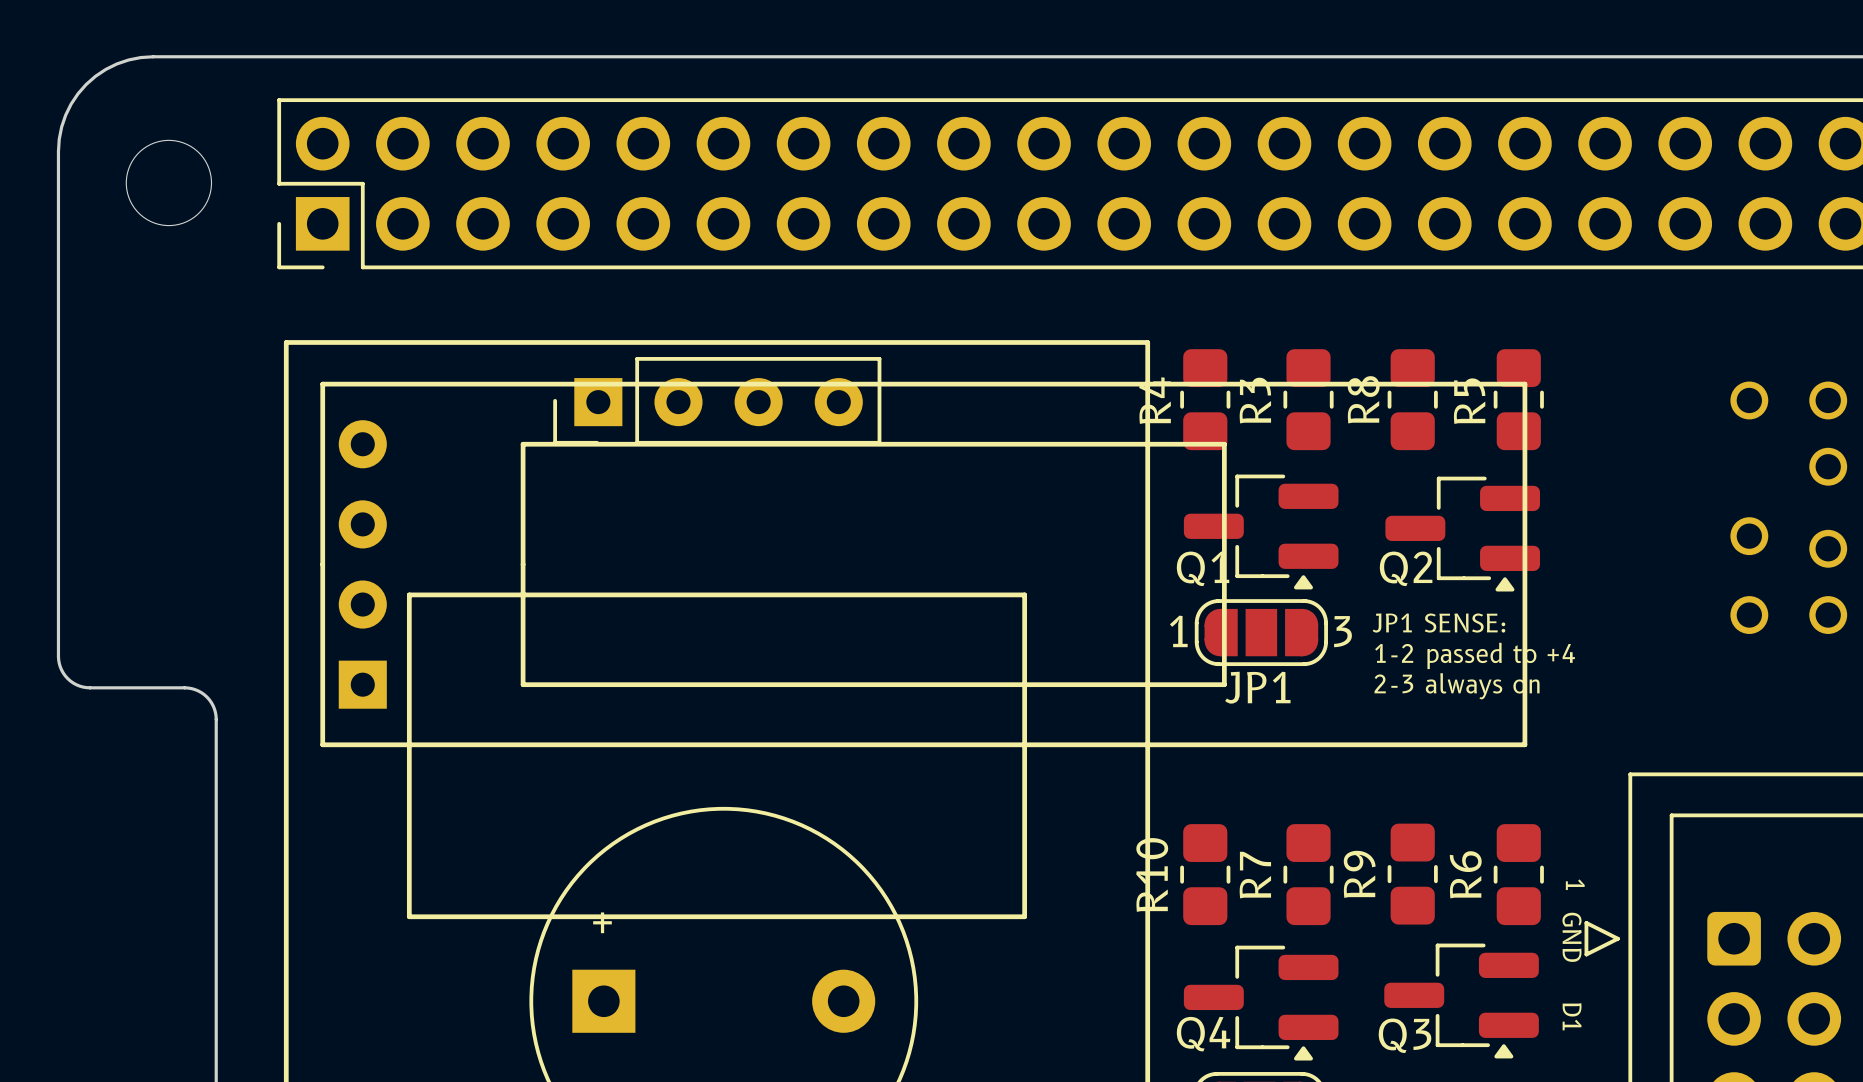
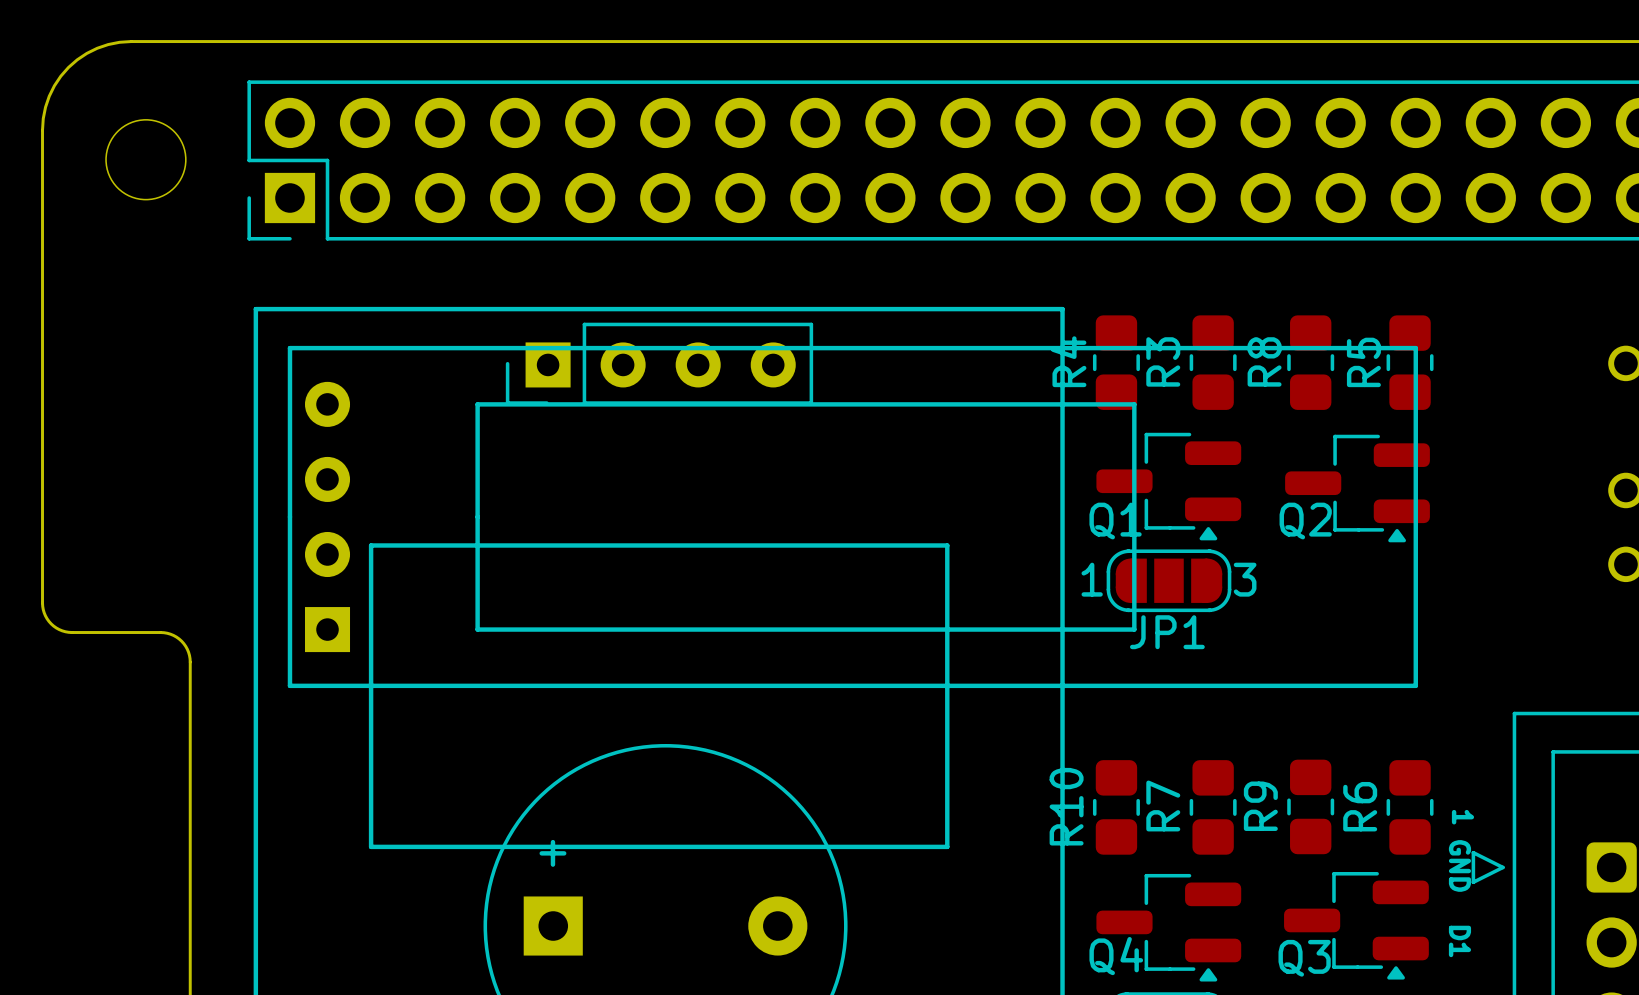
text: JP1 SENSE: (1438, 623) -> none
text: 1-2 passed to +4 (1475, 655) -> none
text: 2-3 always on (1457, 686) -> none

